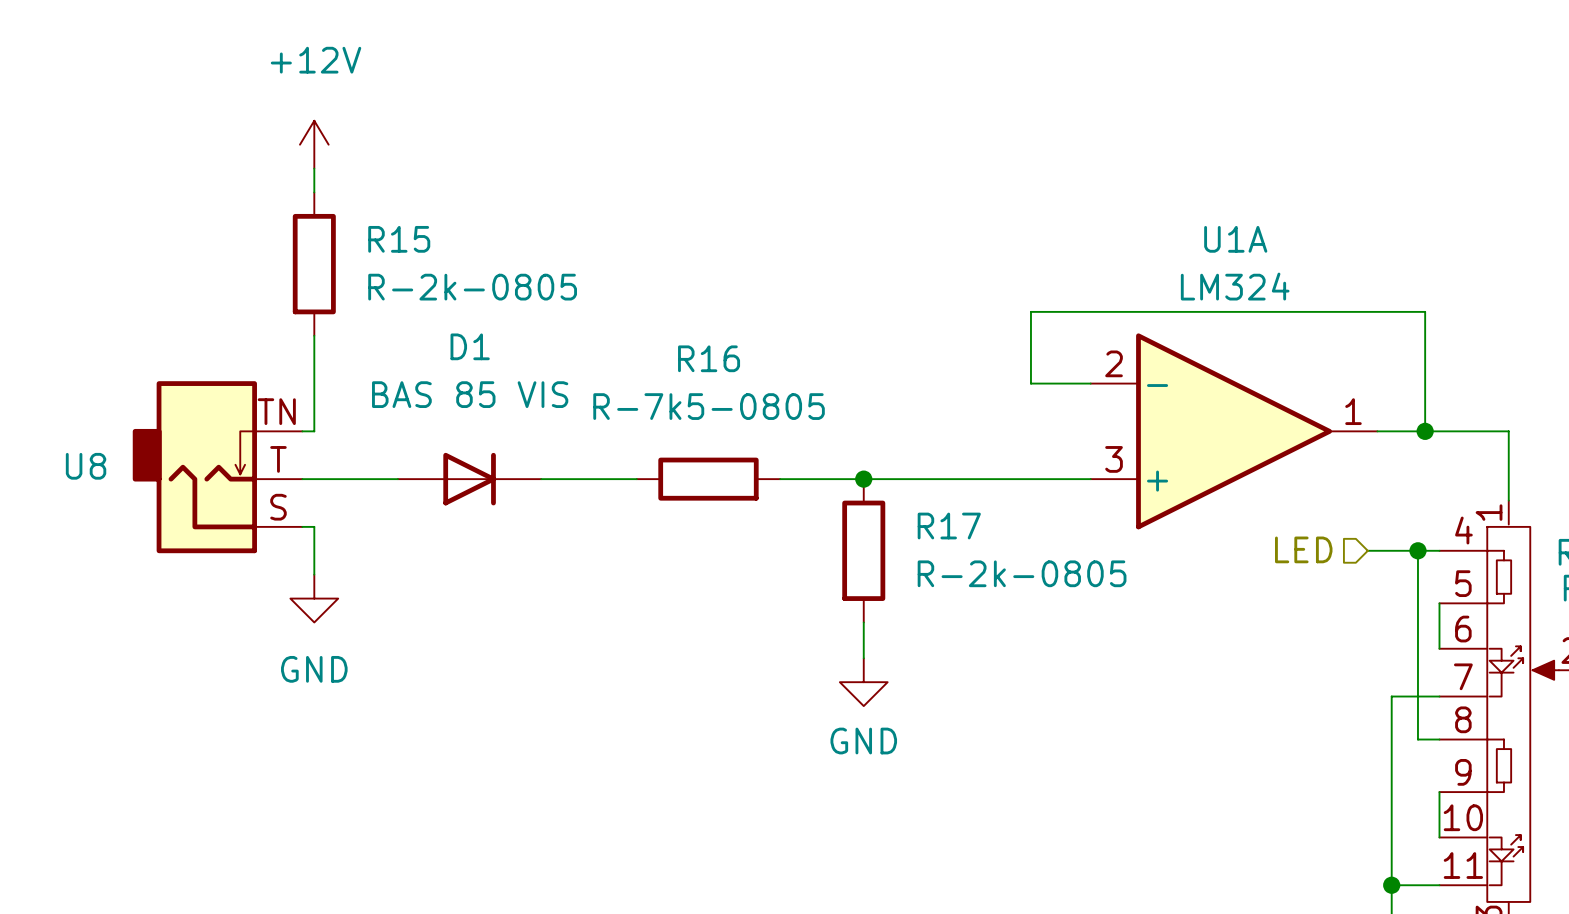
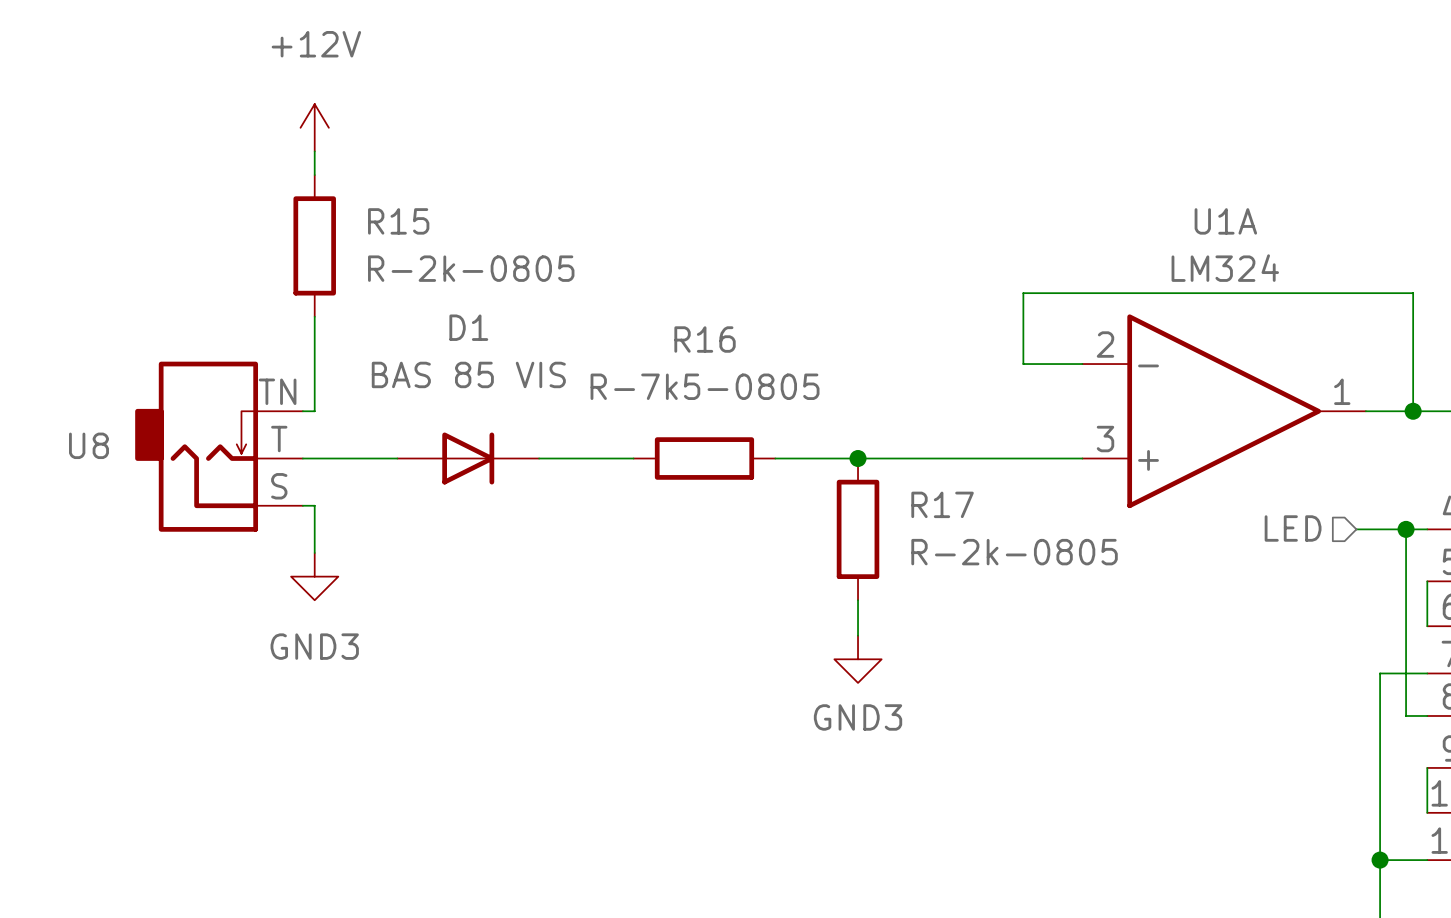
power symbol: GND (314, 598) -> GND3 (314, 576)
power symbol: GND (863, 682) -> GND3 (858, 659)

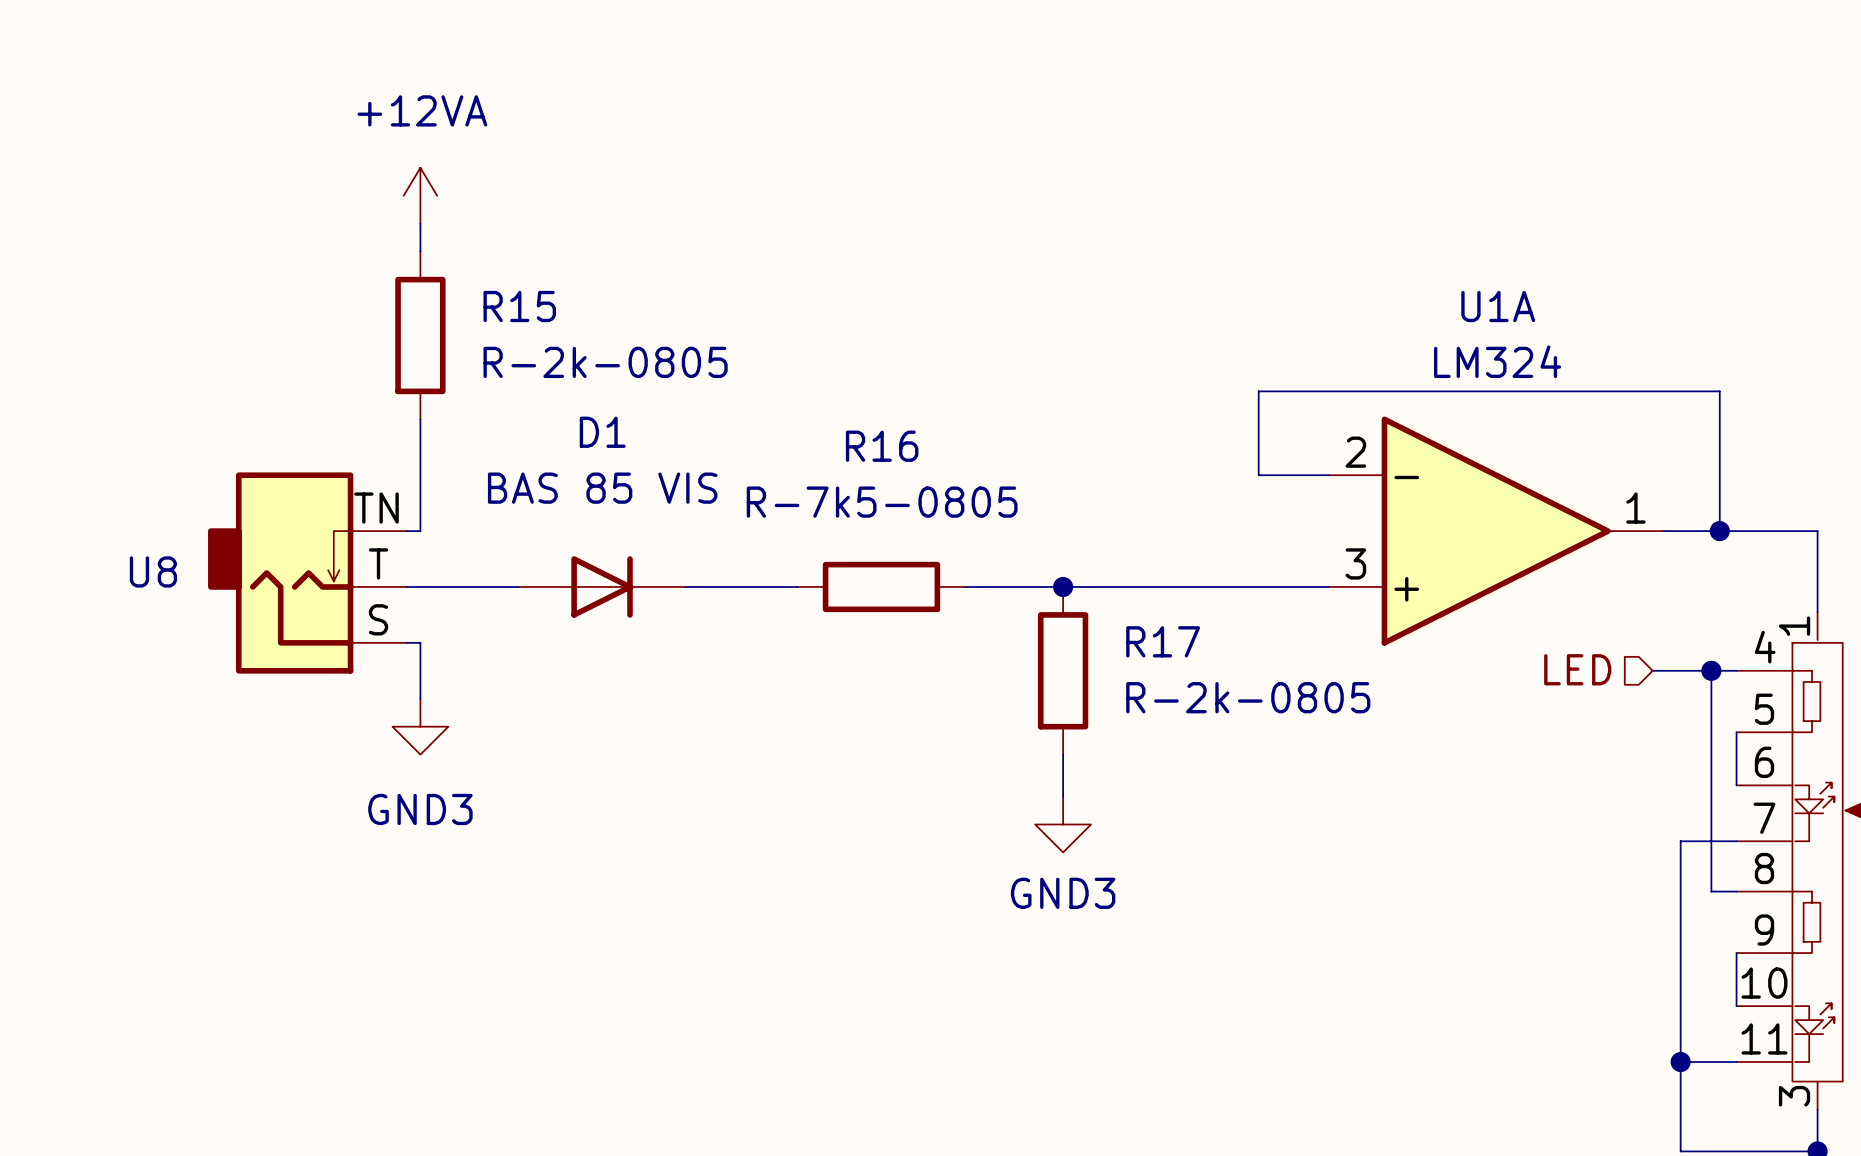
power symbol: +12V (314, 127) -> +12VA (420, 195)

